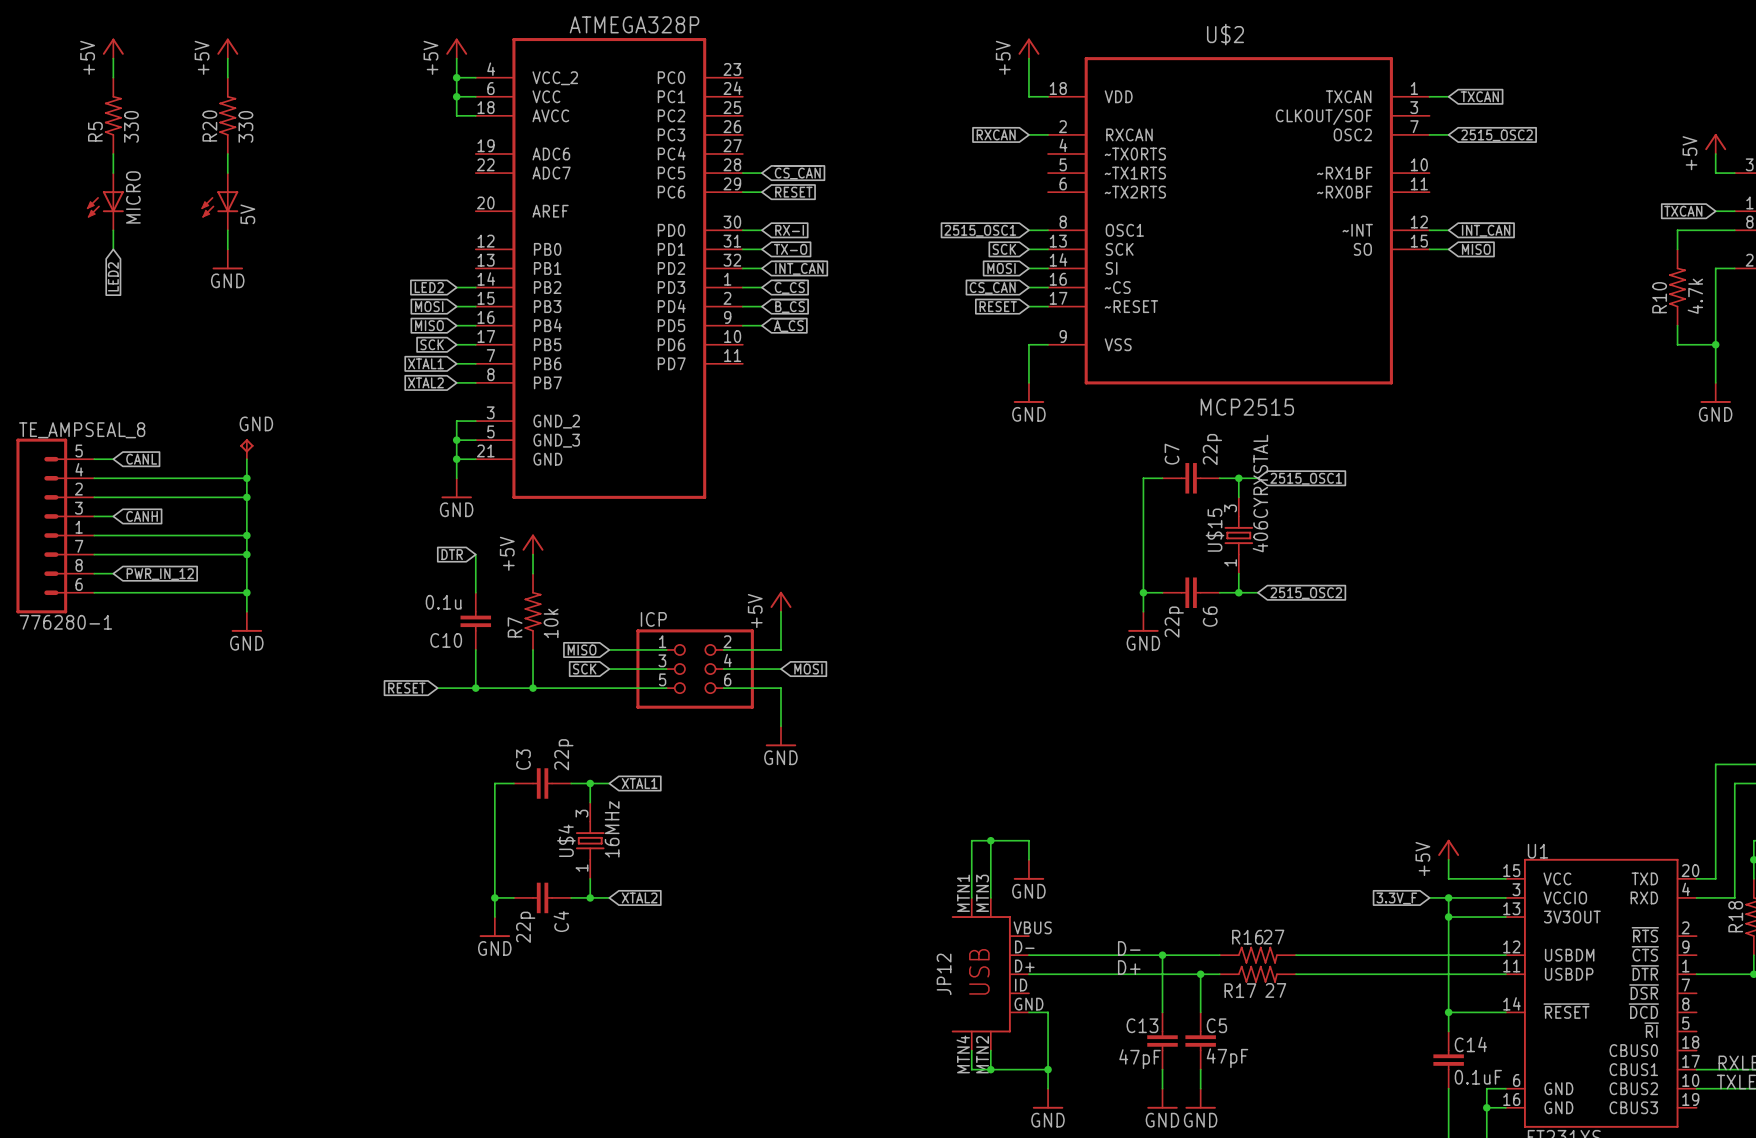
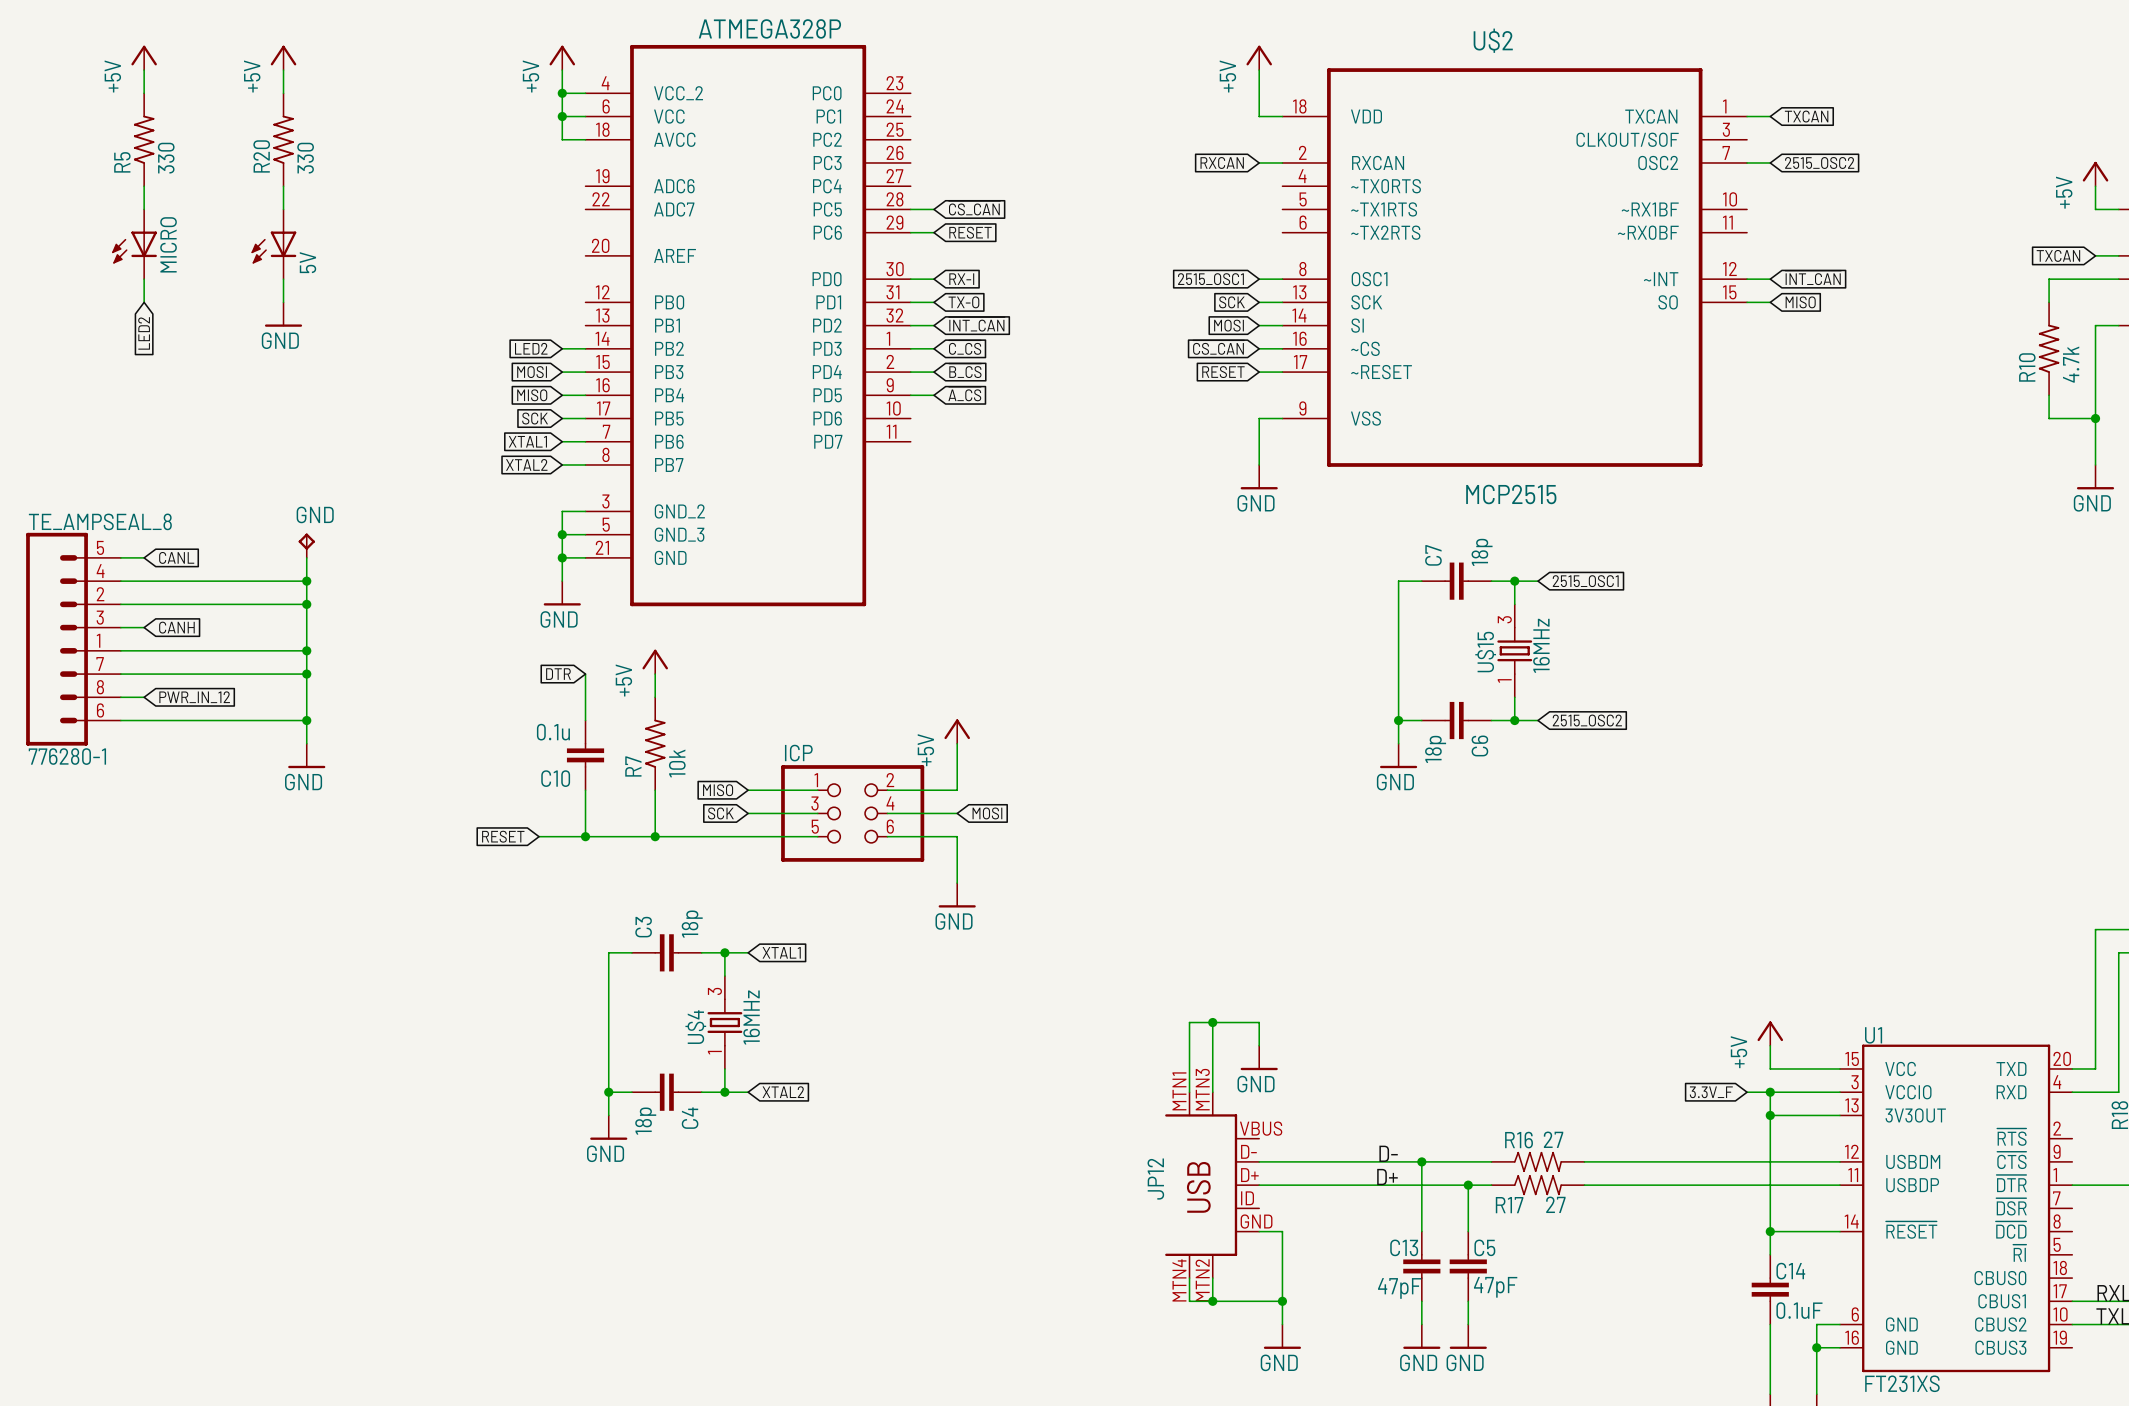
C7 value: 22p (1212, 449) -> 18p (1482, 552)
U$15 value: 406CYRYSTAL (1260, 493) -> 16MHz (1541, 645)
C6 value: 22p (1174, 622) -> 18p (1435, 749)
C3 value: 22p (563, 754) -> 18p (692, 924)
C4 value: 22p (525, 927) -> 18p (645, 1121)

